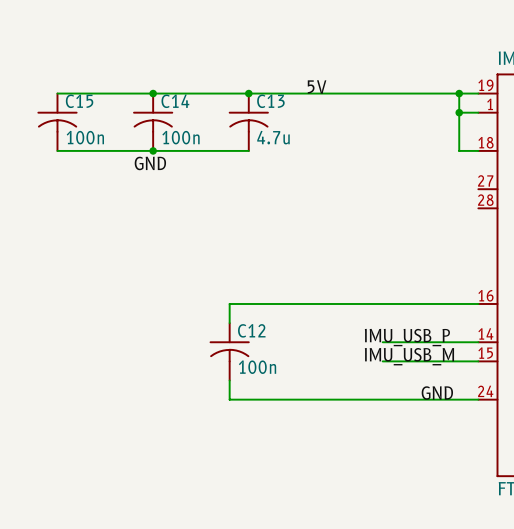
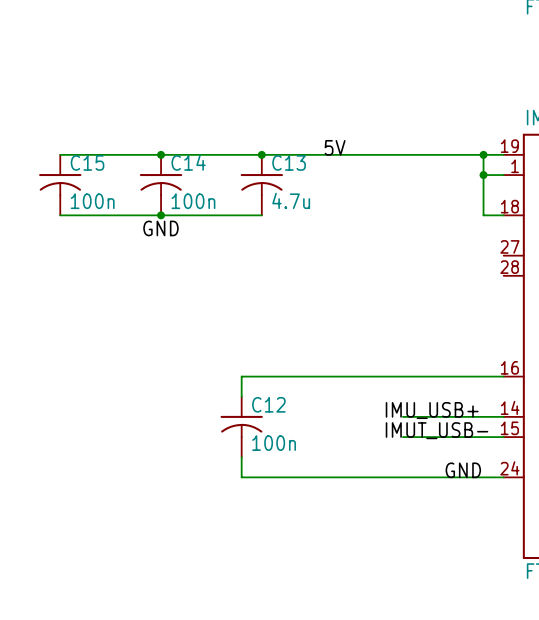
label: IMU_USB_P (407, 337) -> IMU_USB+ (432, 410)
label: IMU_USB_M (409, 356) -> IMUT_USB- (437, 430)

